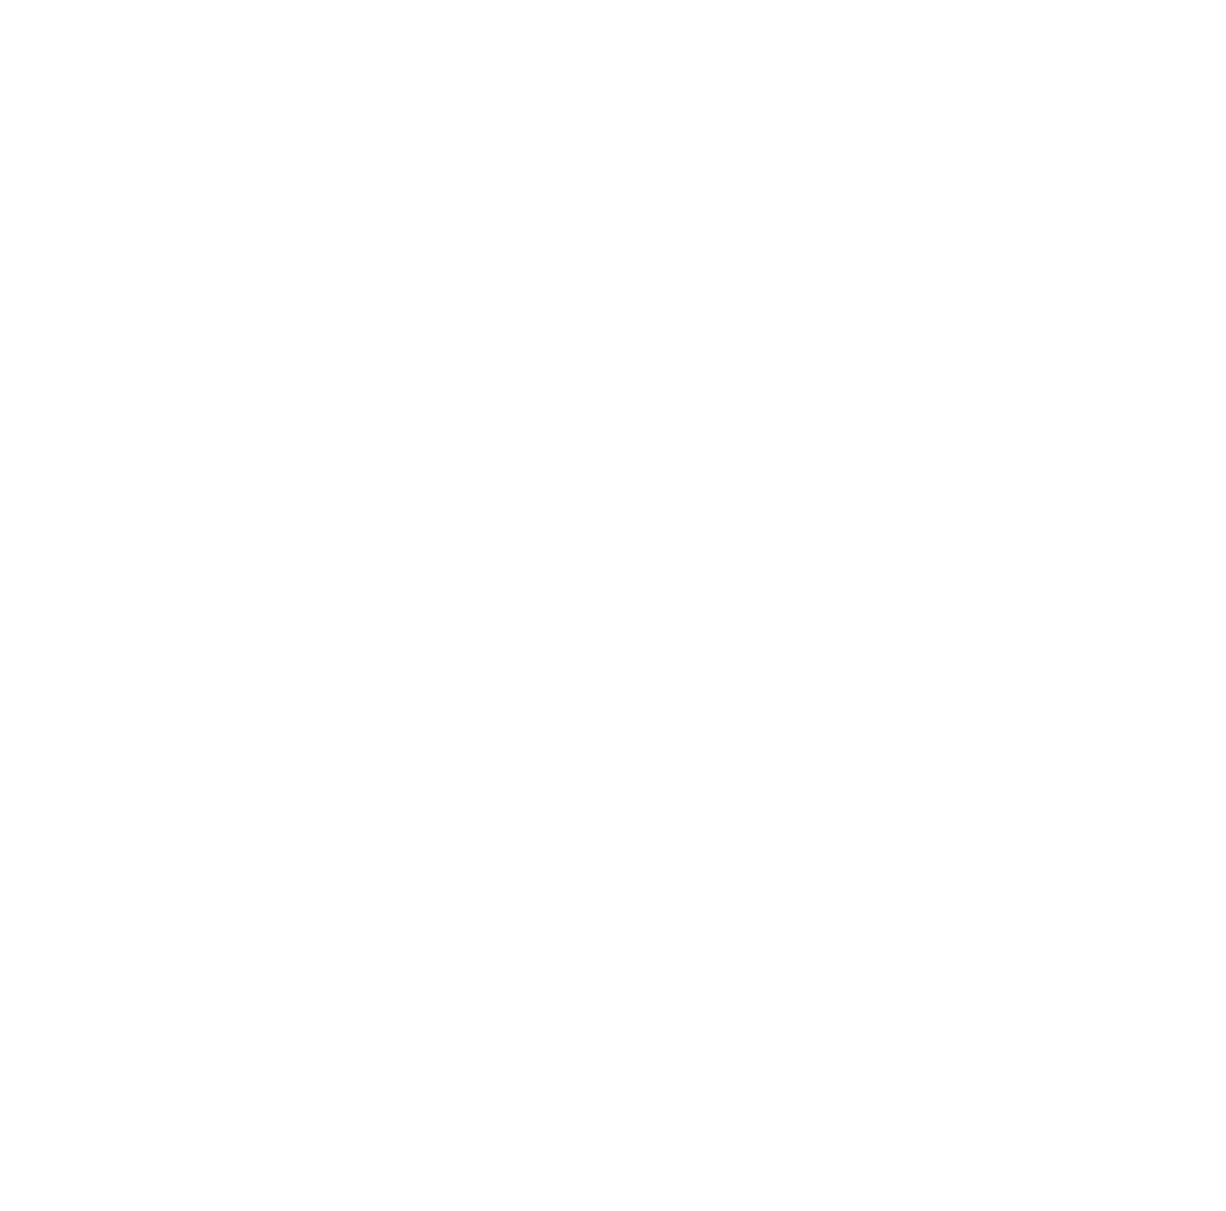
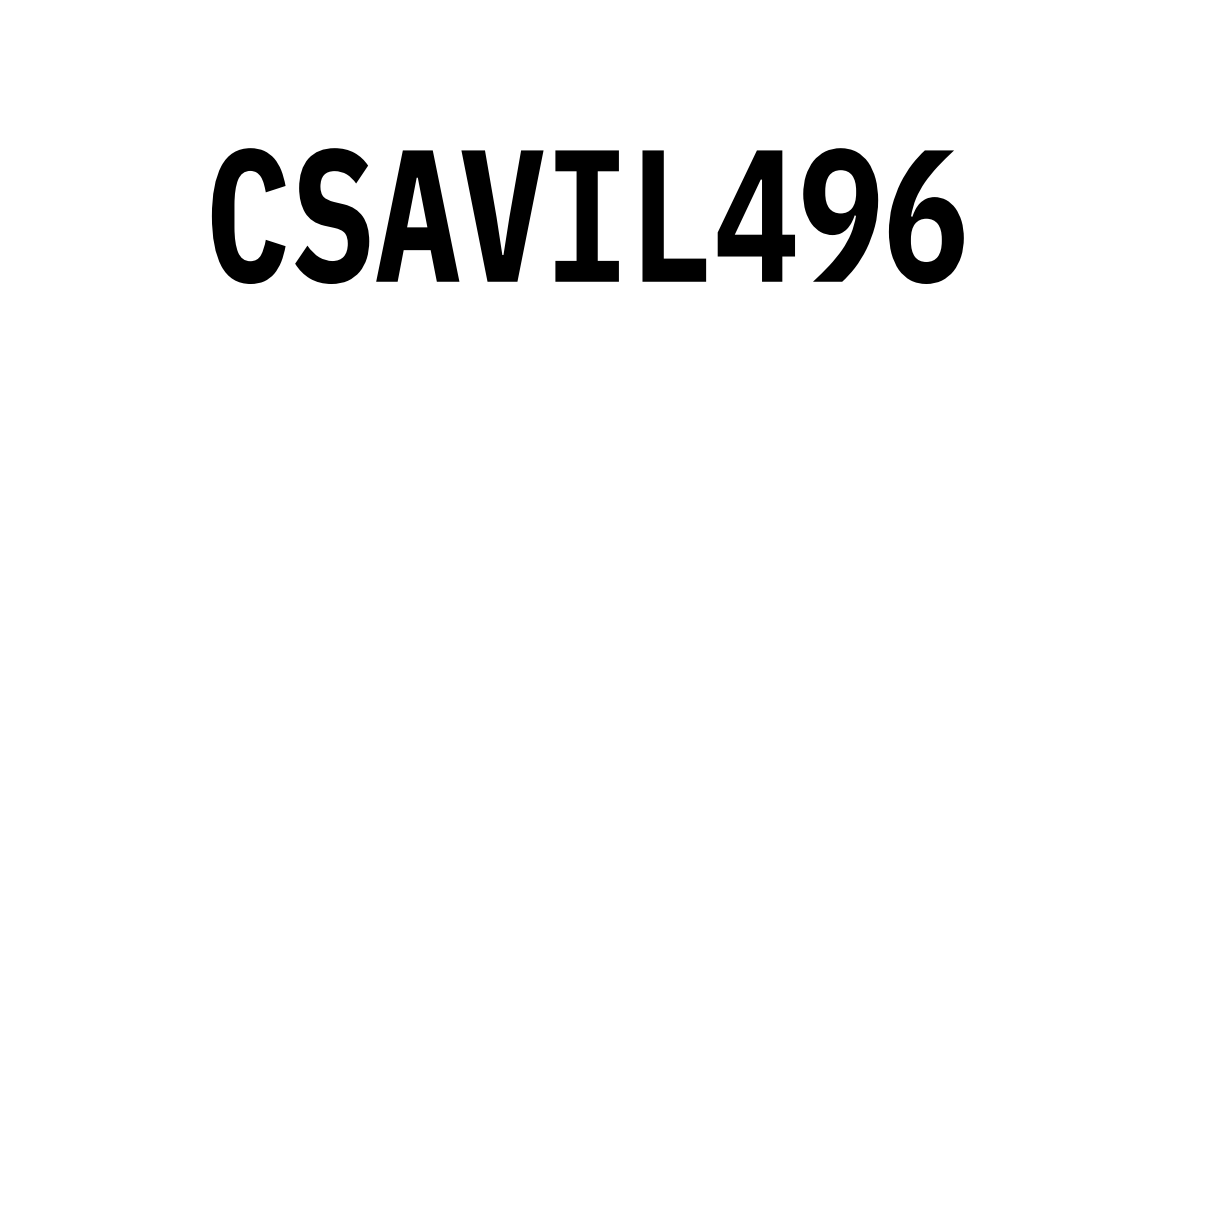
text: none -> CSAVIL496 (587, 216)

